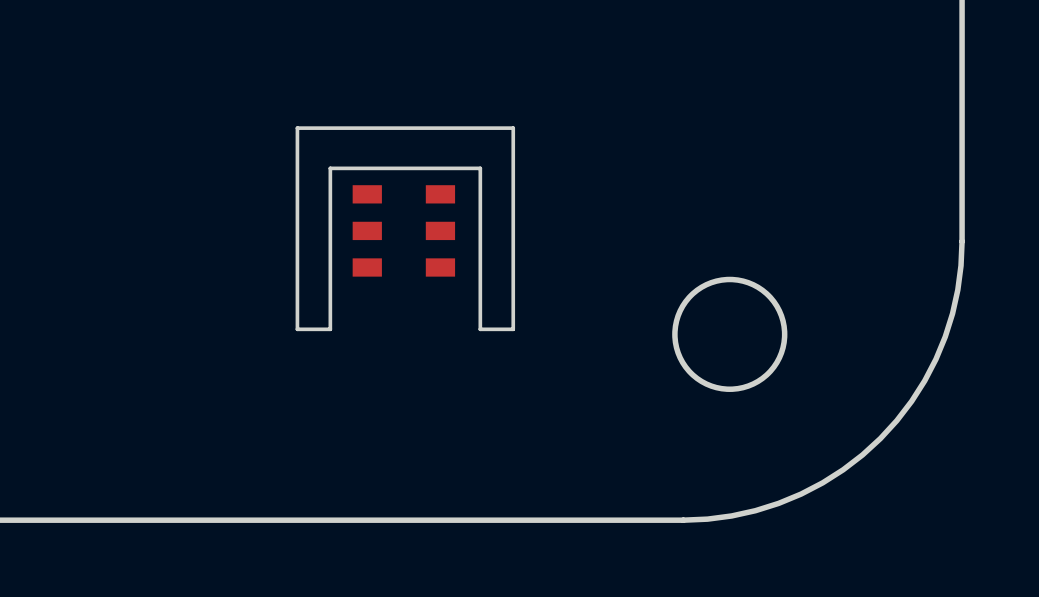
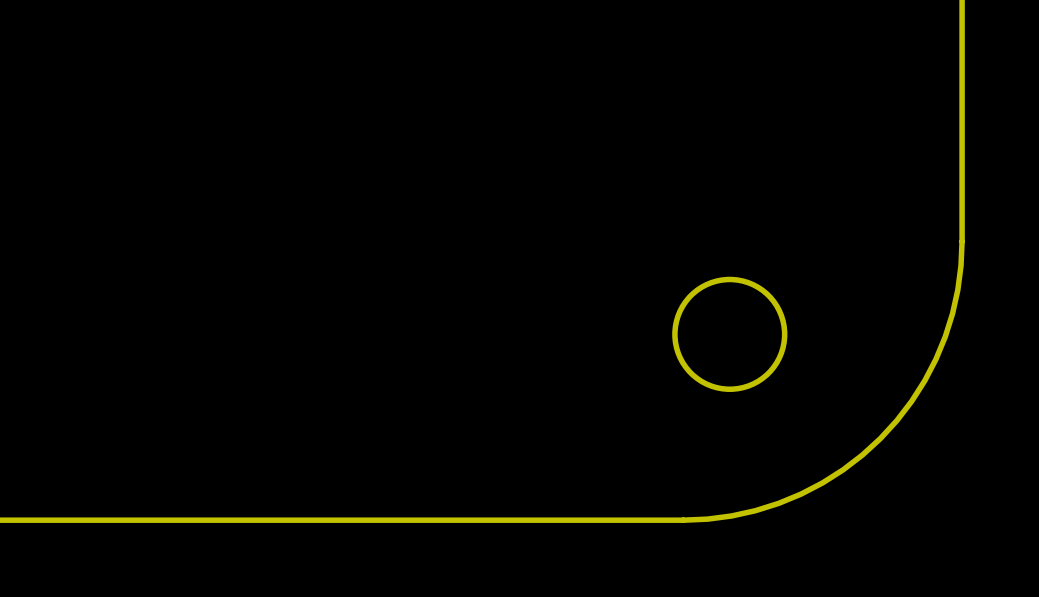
board edge: (513, 128) (513, 329) (480, 329) (480, 168) (330, 168) (330, 329) (297, 329) (297, 128) (513, 128) -> none
part: (403, 230) -> none

